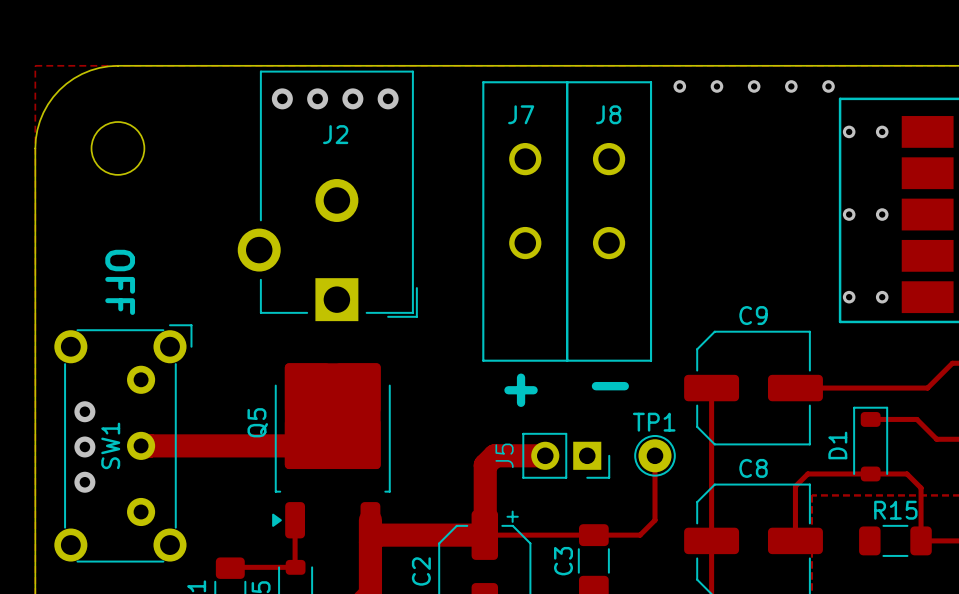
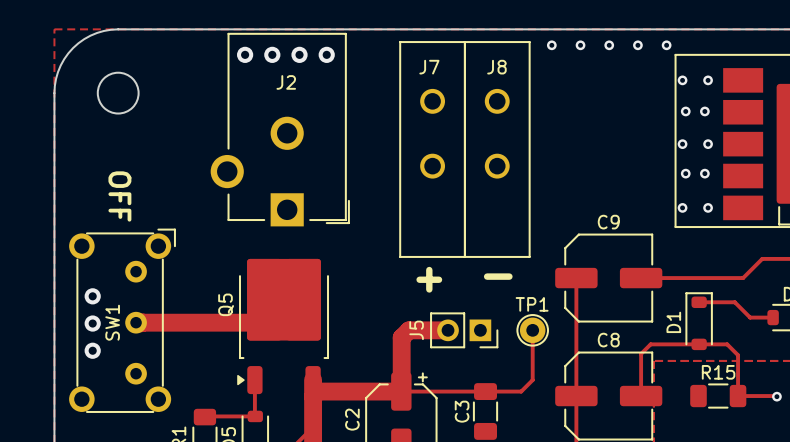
via: none -> (685, 111)
via: none -> (704, 111)
via: none -> (685, 173)
via: none -> (704, 173)

